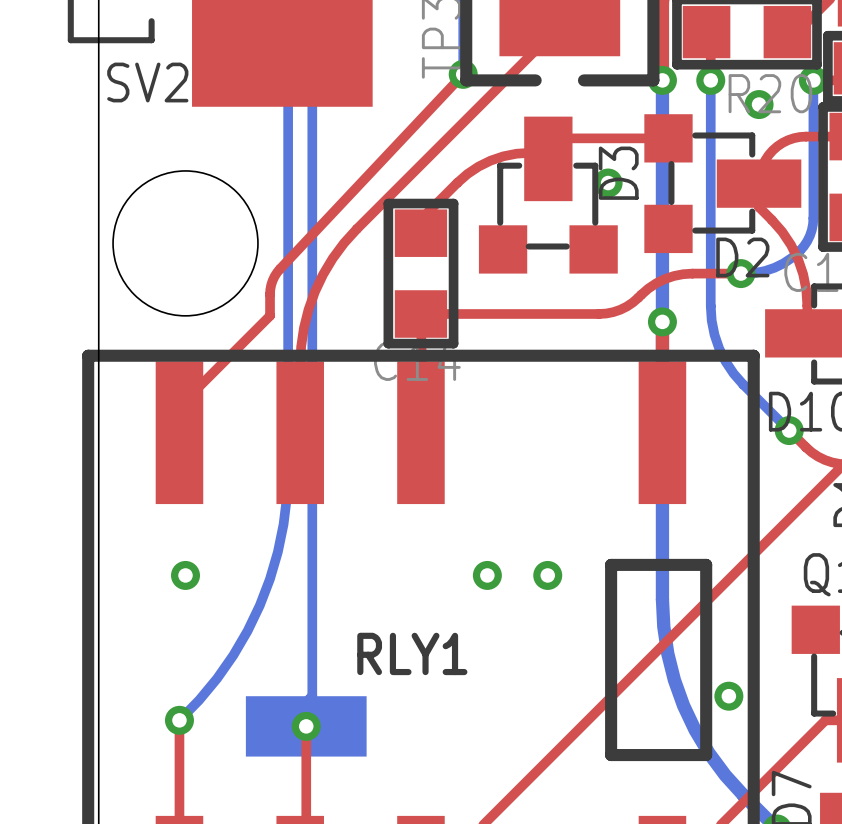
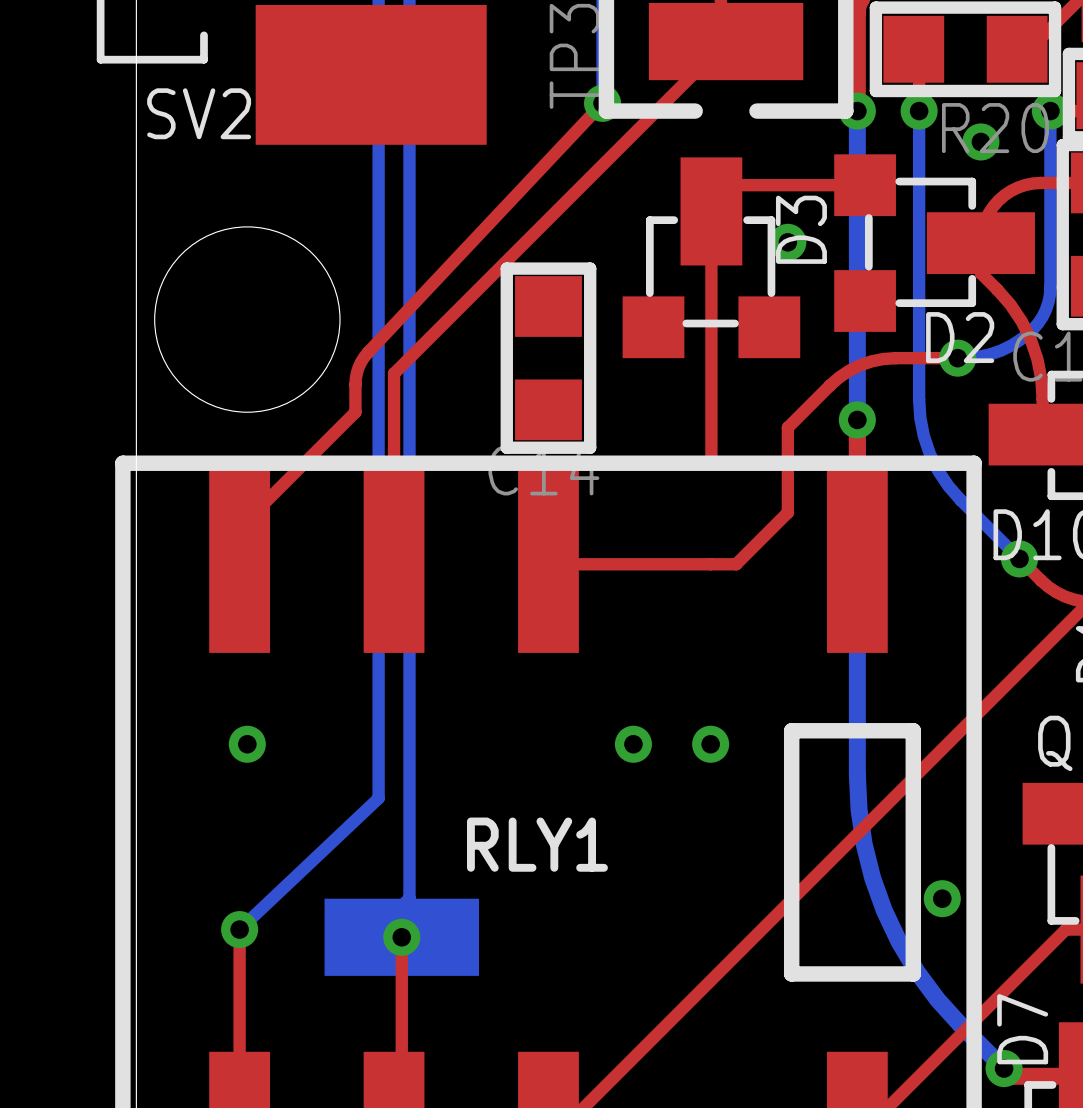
top track: (548, 158) (542, 152) (516, 153) (490, 160) (478, 166) (457, 182) (420, 219) (420, 233) -> (711, 211) (710, 460)
top track: (356, 229) (332, 258) (314, 291) (303, 328) (300, 365) -> (466, 301) (394, 373) (394, 476)
top track: (638, 297) (620, 309) (606, 313) (420, 313) (422, 434) -> (826, 389) (787, 427) (787, 512) (736, 564) (551, 564)
bottom track: (288, 468) (283, 524) (269, 579) (259, 605) (233, 655) (199, 700) (179, 720) -> (378, 607) (378, 798) (239, 929)

